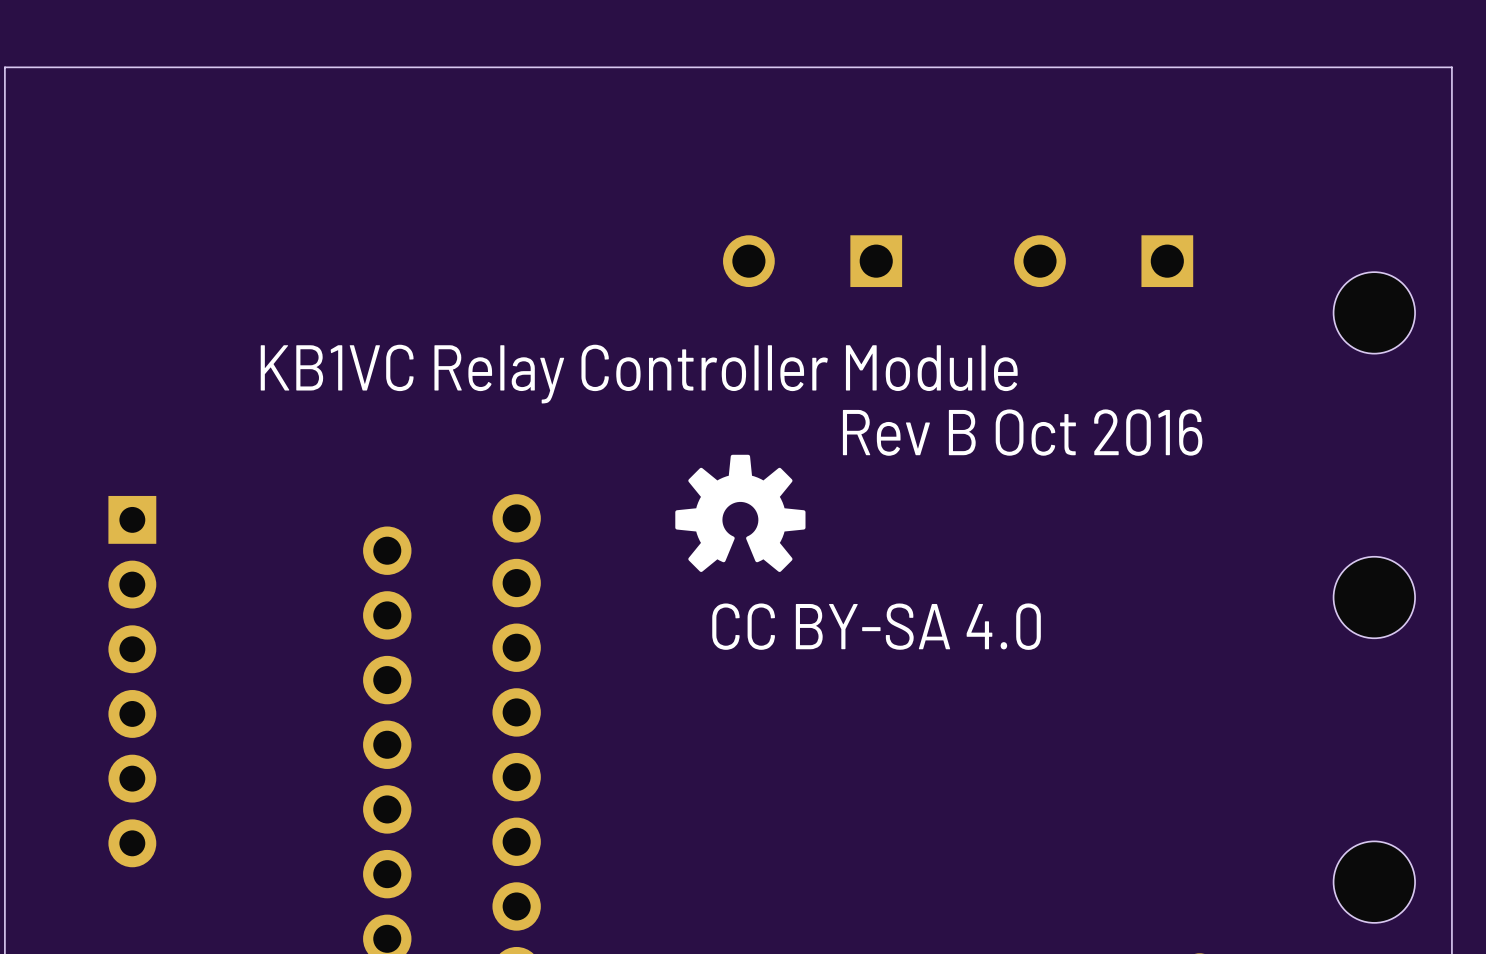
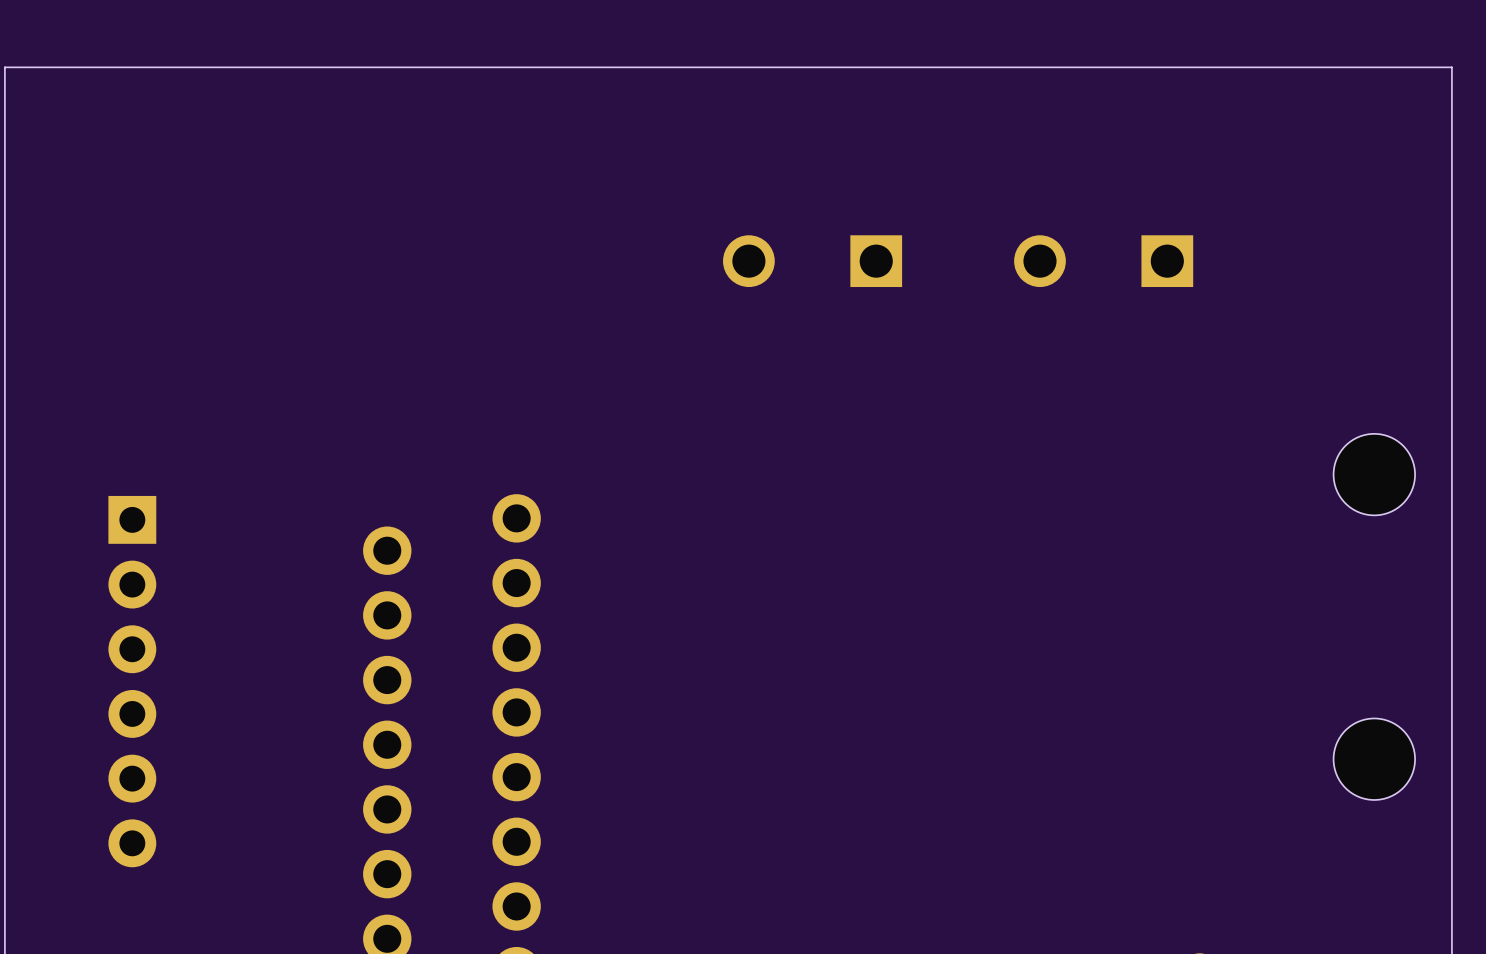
hole: (1374, 312) -> none
text: KB1VC Relay Controller Module (639, 374) -> none
text: Rev B Oct 2016 (1022, 432) -> none
drawing: [675, 454, 806, 572] -> none
hole: none -> (1374, 474)
hole: (1374, 597) -> none
text: CC BY-SA 4.0 (876, 626) -> none
hole: none -> (1374, 759)
hole: (1374, 882) -> none

